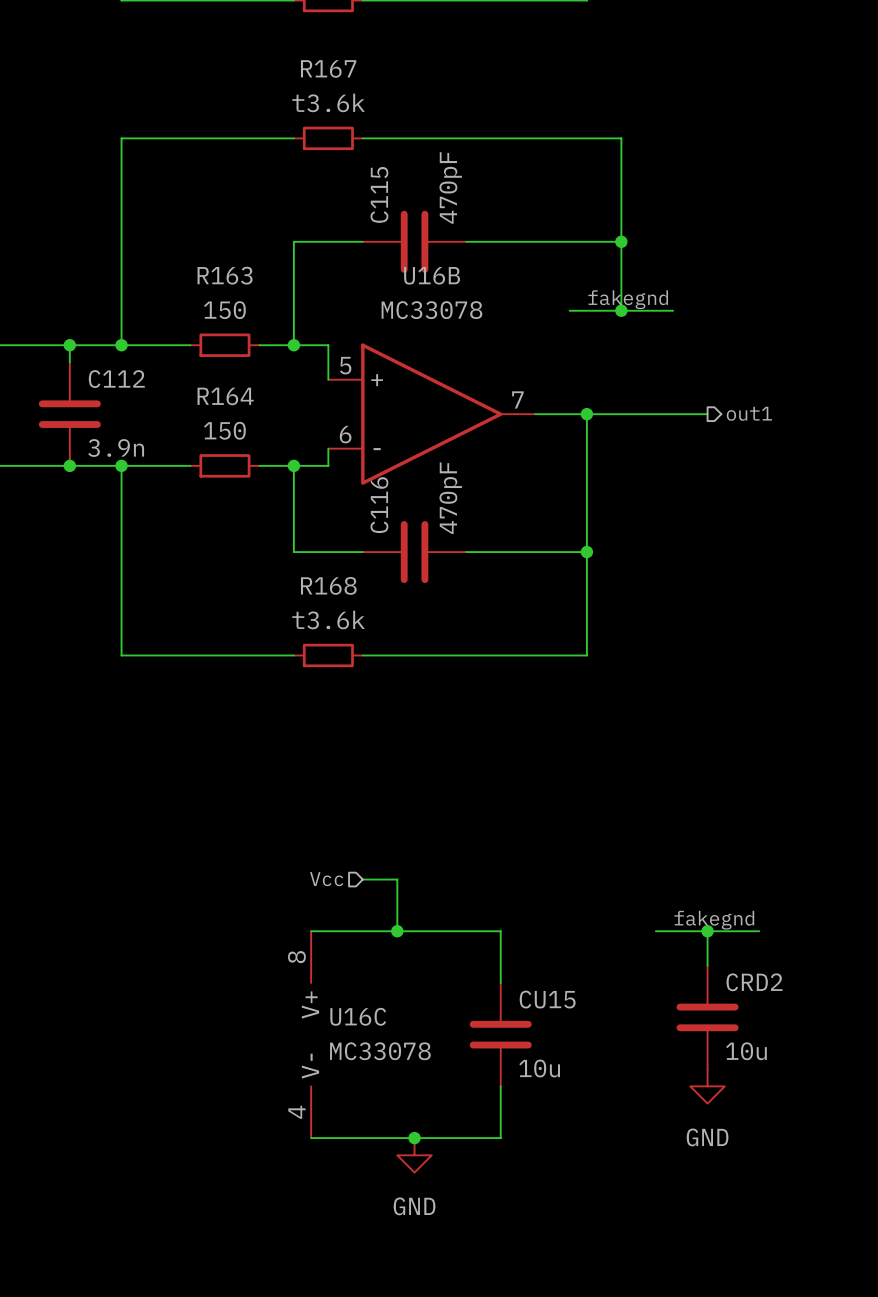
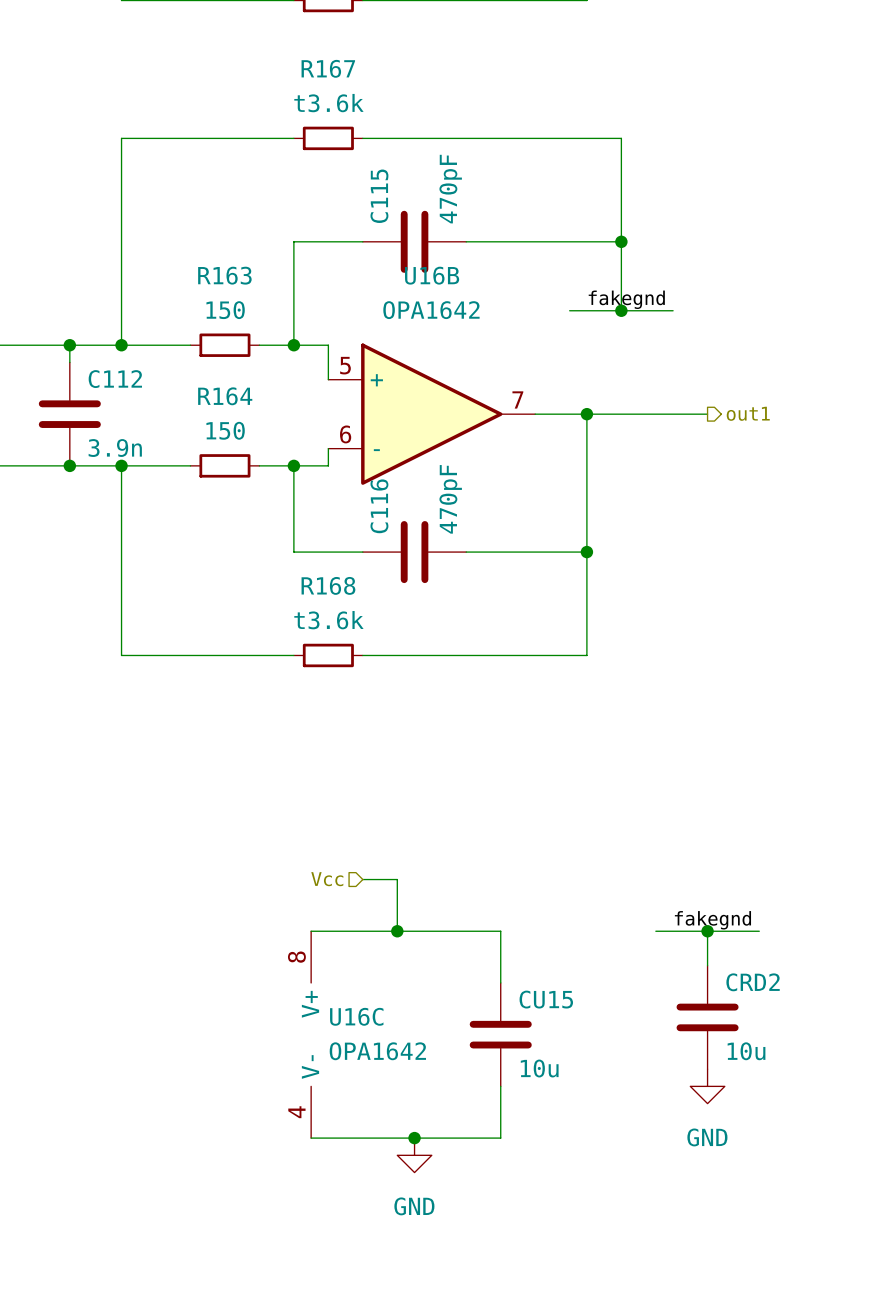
U16B value: MC33078 (431, 310) -> OPA1642 (431, 310)
U16C value: MC33078 (380, 1051) -> OPA1642 (377, 1051)

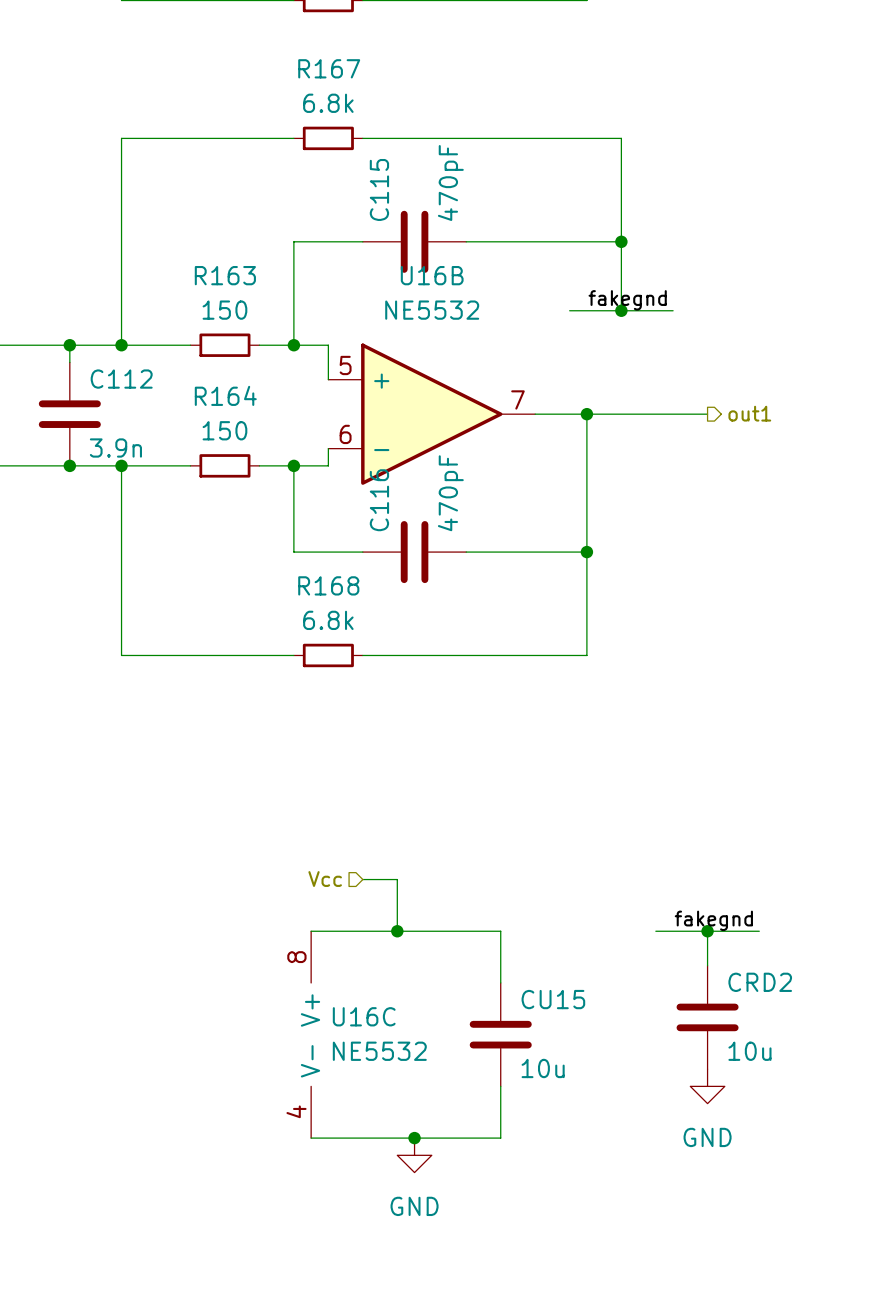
R167 value: t3.6k (328, 103) -> 6.8k (328, 103)
U16B value: OPA1642 (431, 310) -> NE5532 (432, 310)
R168 value: t3.6k (328, 620) -> 6.8k (328, 620)
U16C value: OPA1642 (377, 1051) -> NE5532 (379, 1051)

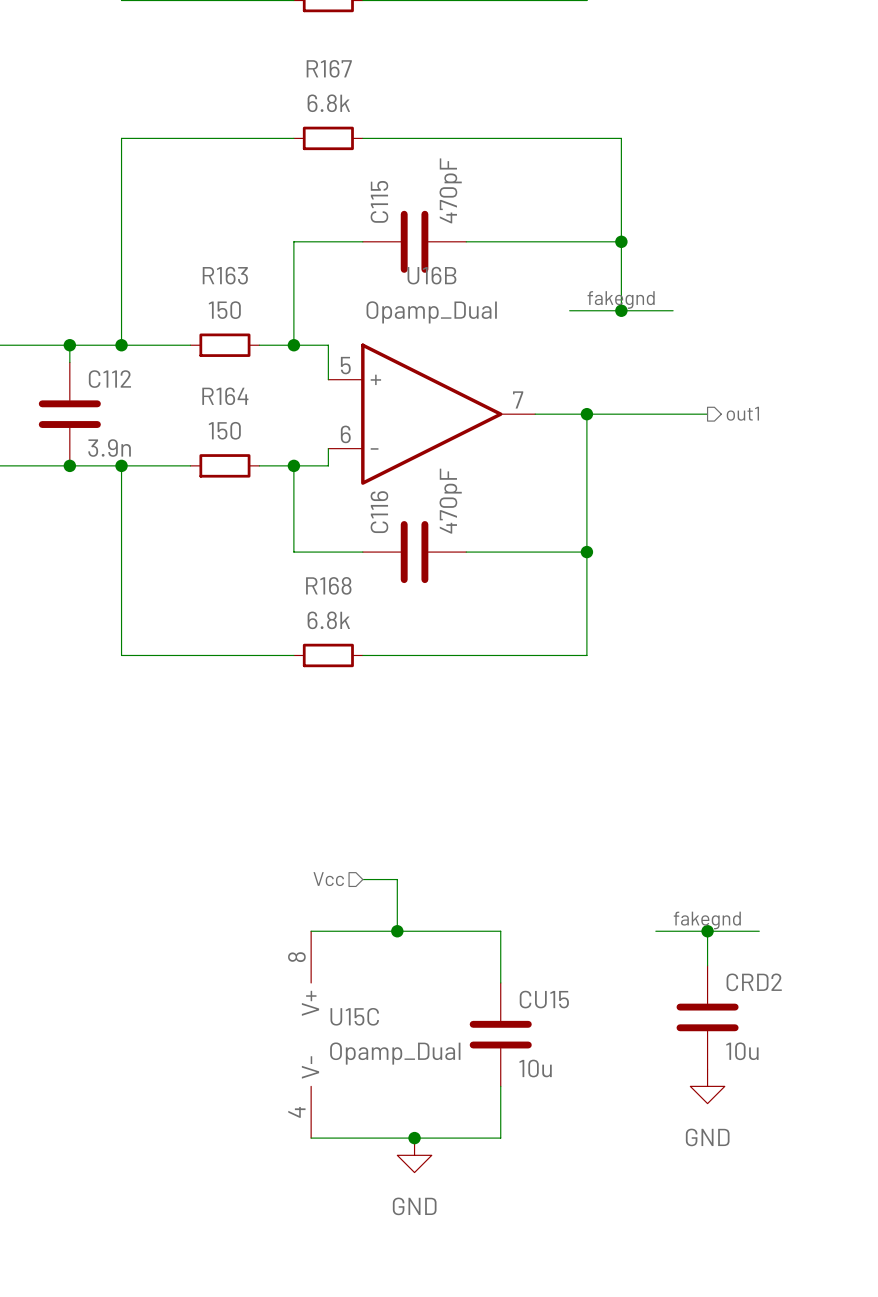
U16B value: NE5532 (432, 310) -> Opamp_Dual (431, 312)
U16C name: U16C (364, 1016) -> U15C (354, 1016)
U16C value: NE5532 (379, 1051) -> Opamp_Dual (395, 1053)

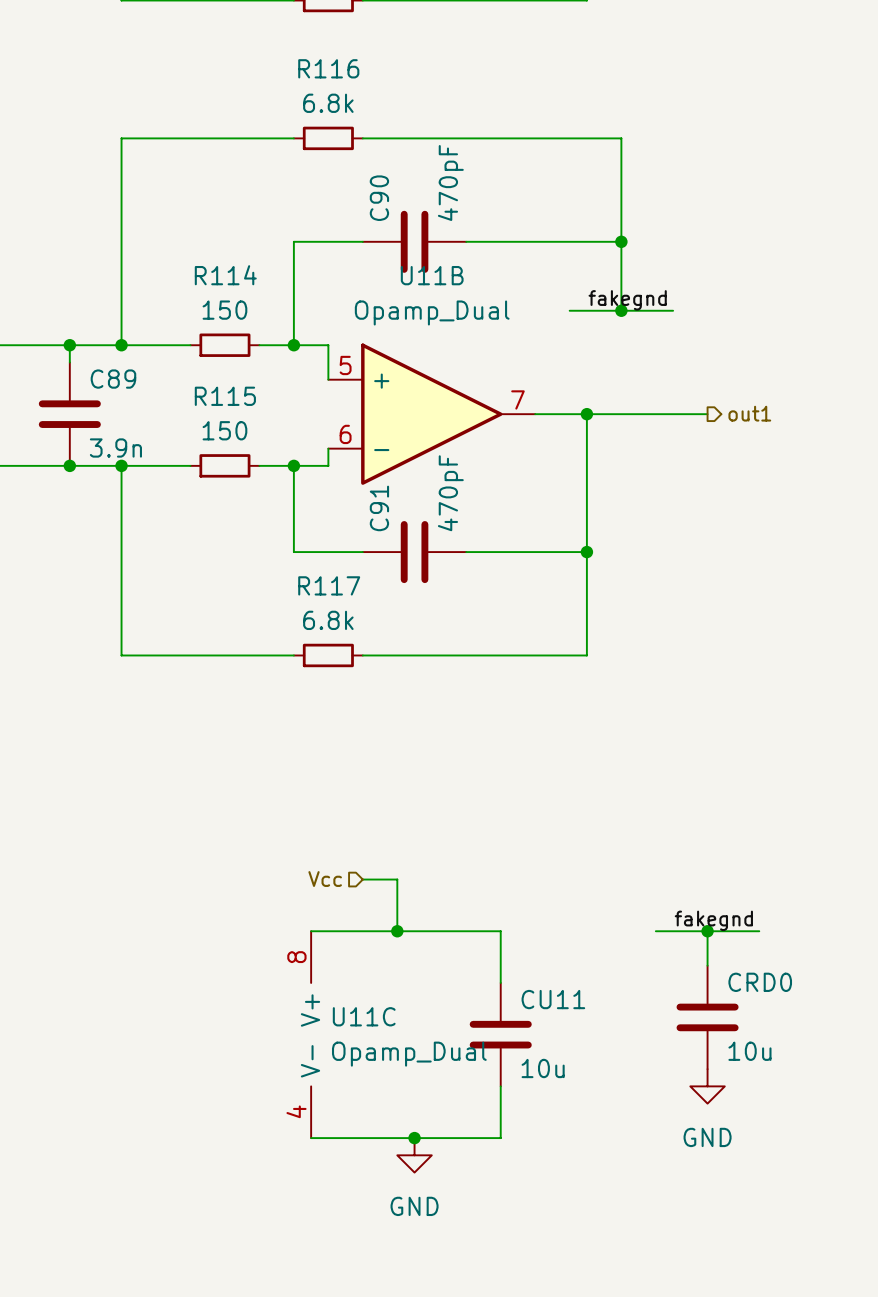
R167 name: R167 (329, 68) -> R116 (328, 68)
C115 name: C115 (379, 201) -> C90 (379, 198)
R163 name: R163 (225, 275) -> R114 (225, 275)
U16B name: U16B (431, 275) -> U11B (432, 275)
C112 name: C112 (109, 379) -> C89 (113, 379)
R164 name: R164 (225, 396) -> R115 (225, 396)
C116 name: C116 (379, 512) -> C91 (379, 508)
R168 name: R168 (328, 585) -> R117 (329, 585)
CRD2 name: CRD2 (754, 982) -> CRD0 (760, 982)
CU15 name: CU15 (544, 999) -> CU11 (553, 999)
U15C name: U15C (354, 1016) -> U11C (364, 1016)

